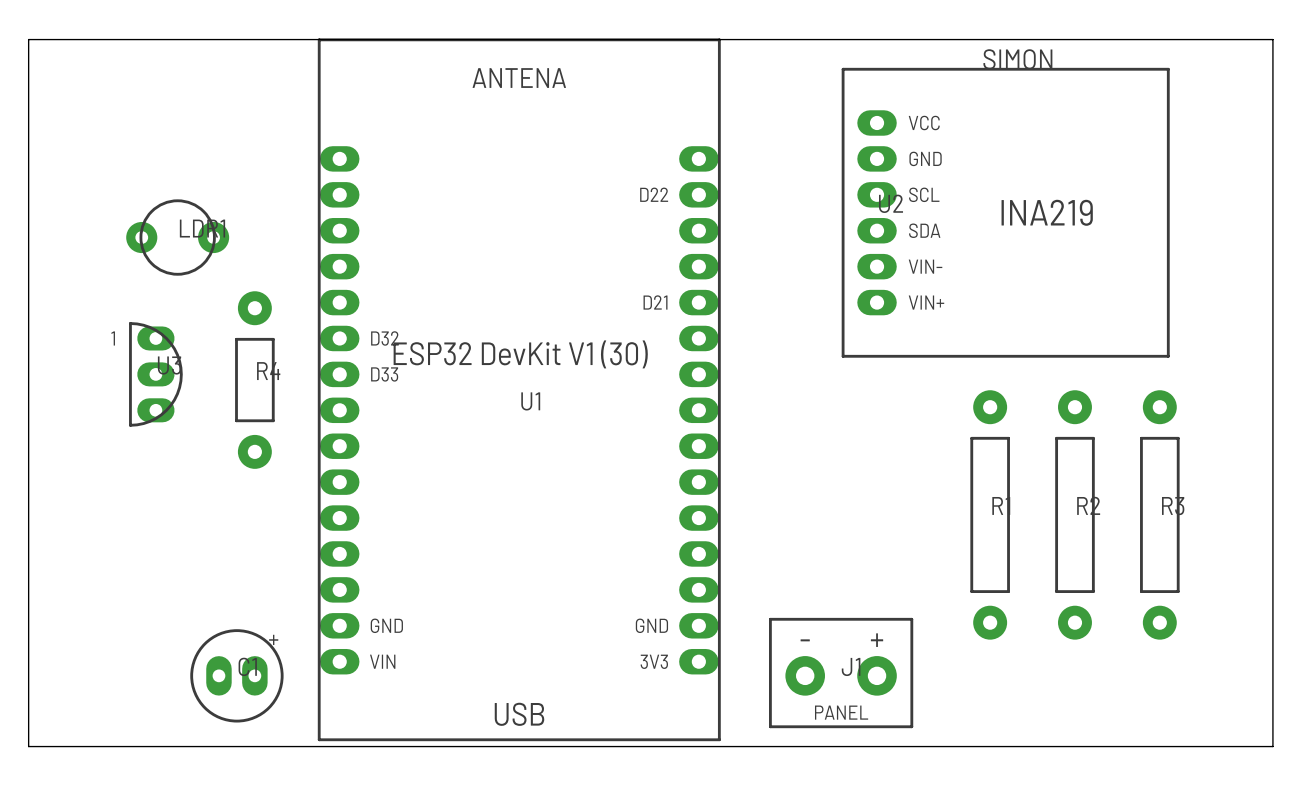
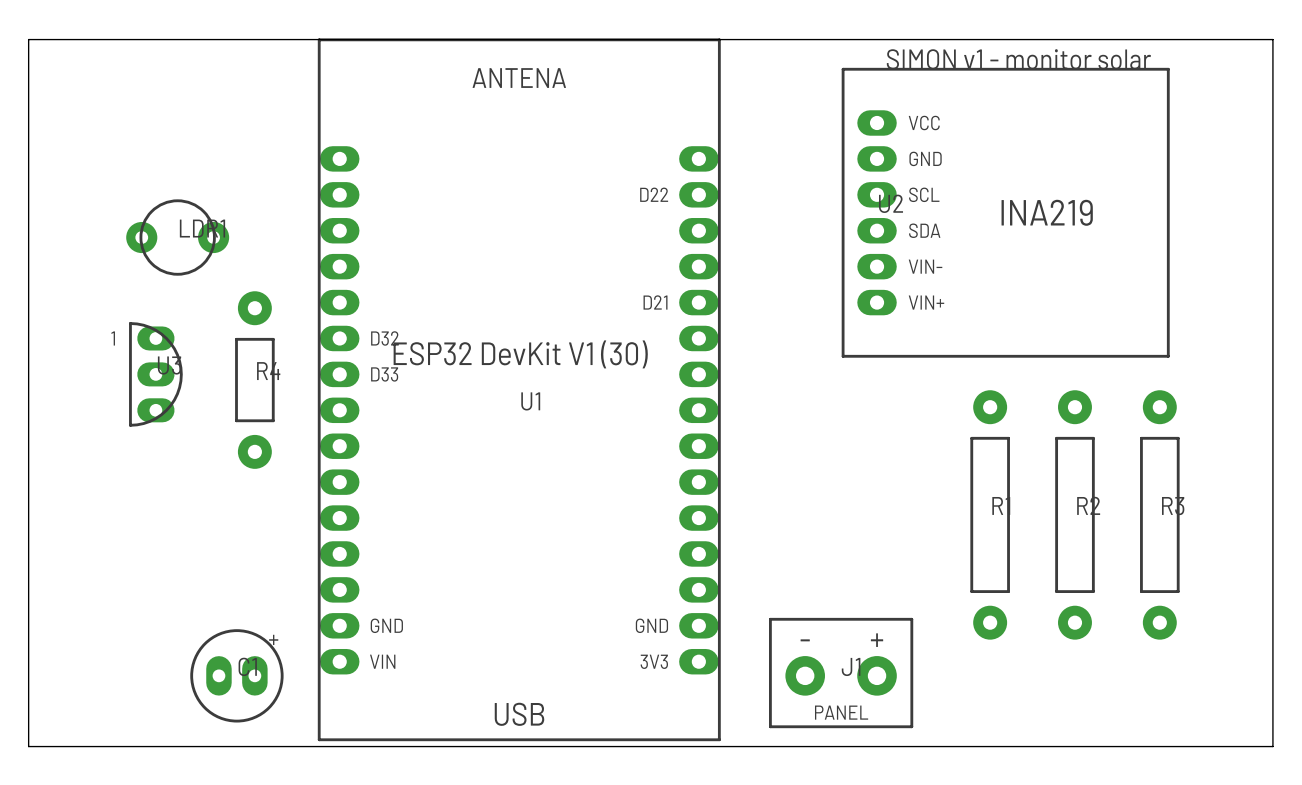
text: SIMON (1017, 59) -> SIMON v1 - monitor solar (1018, 59)

